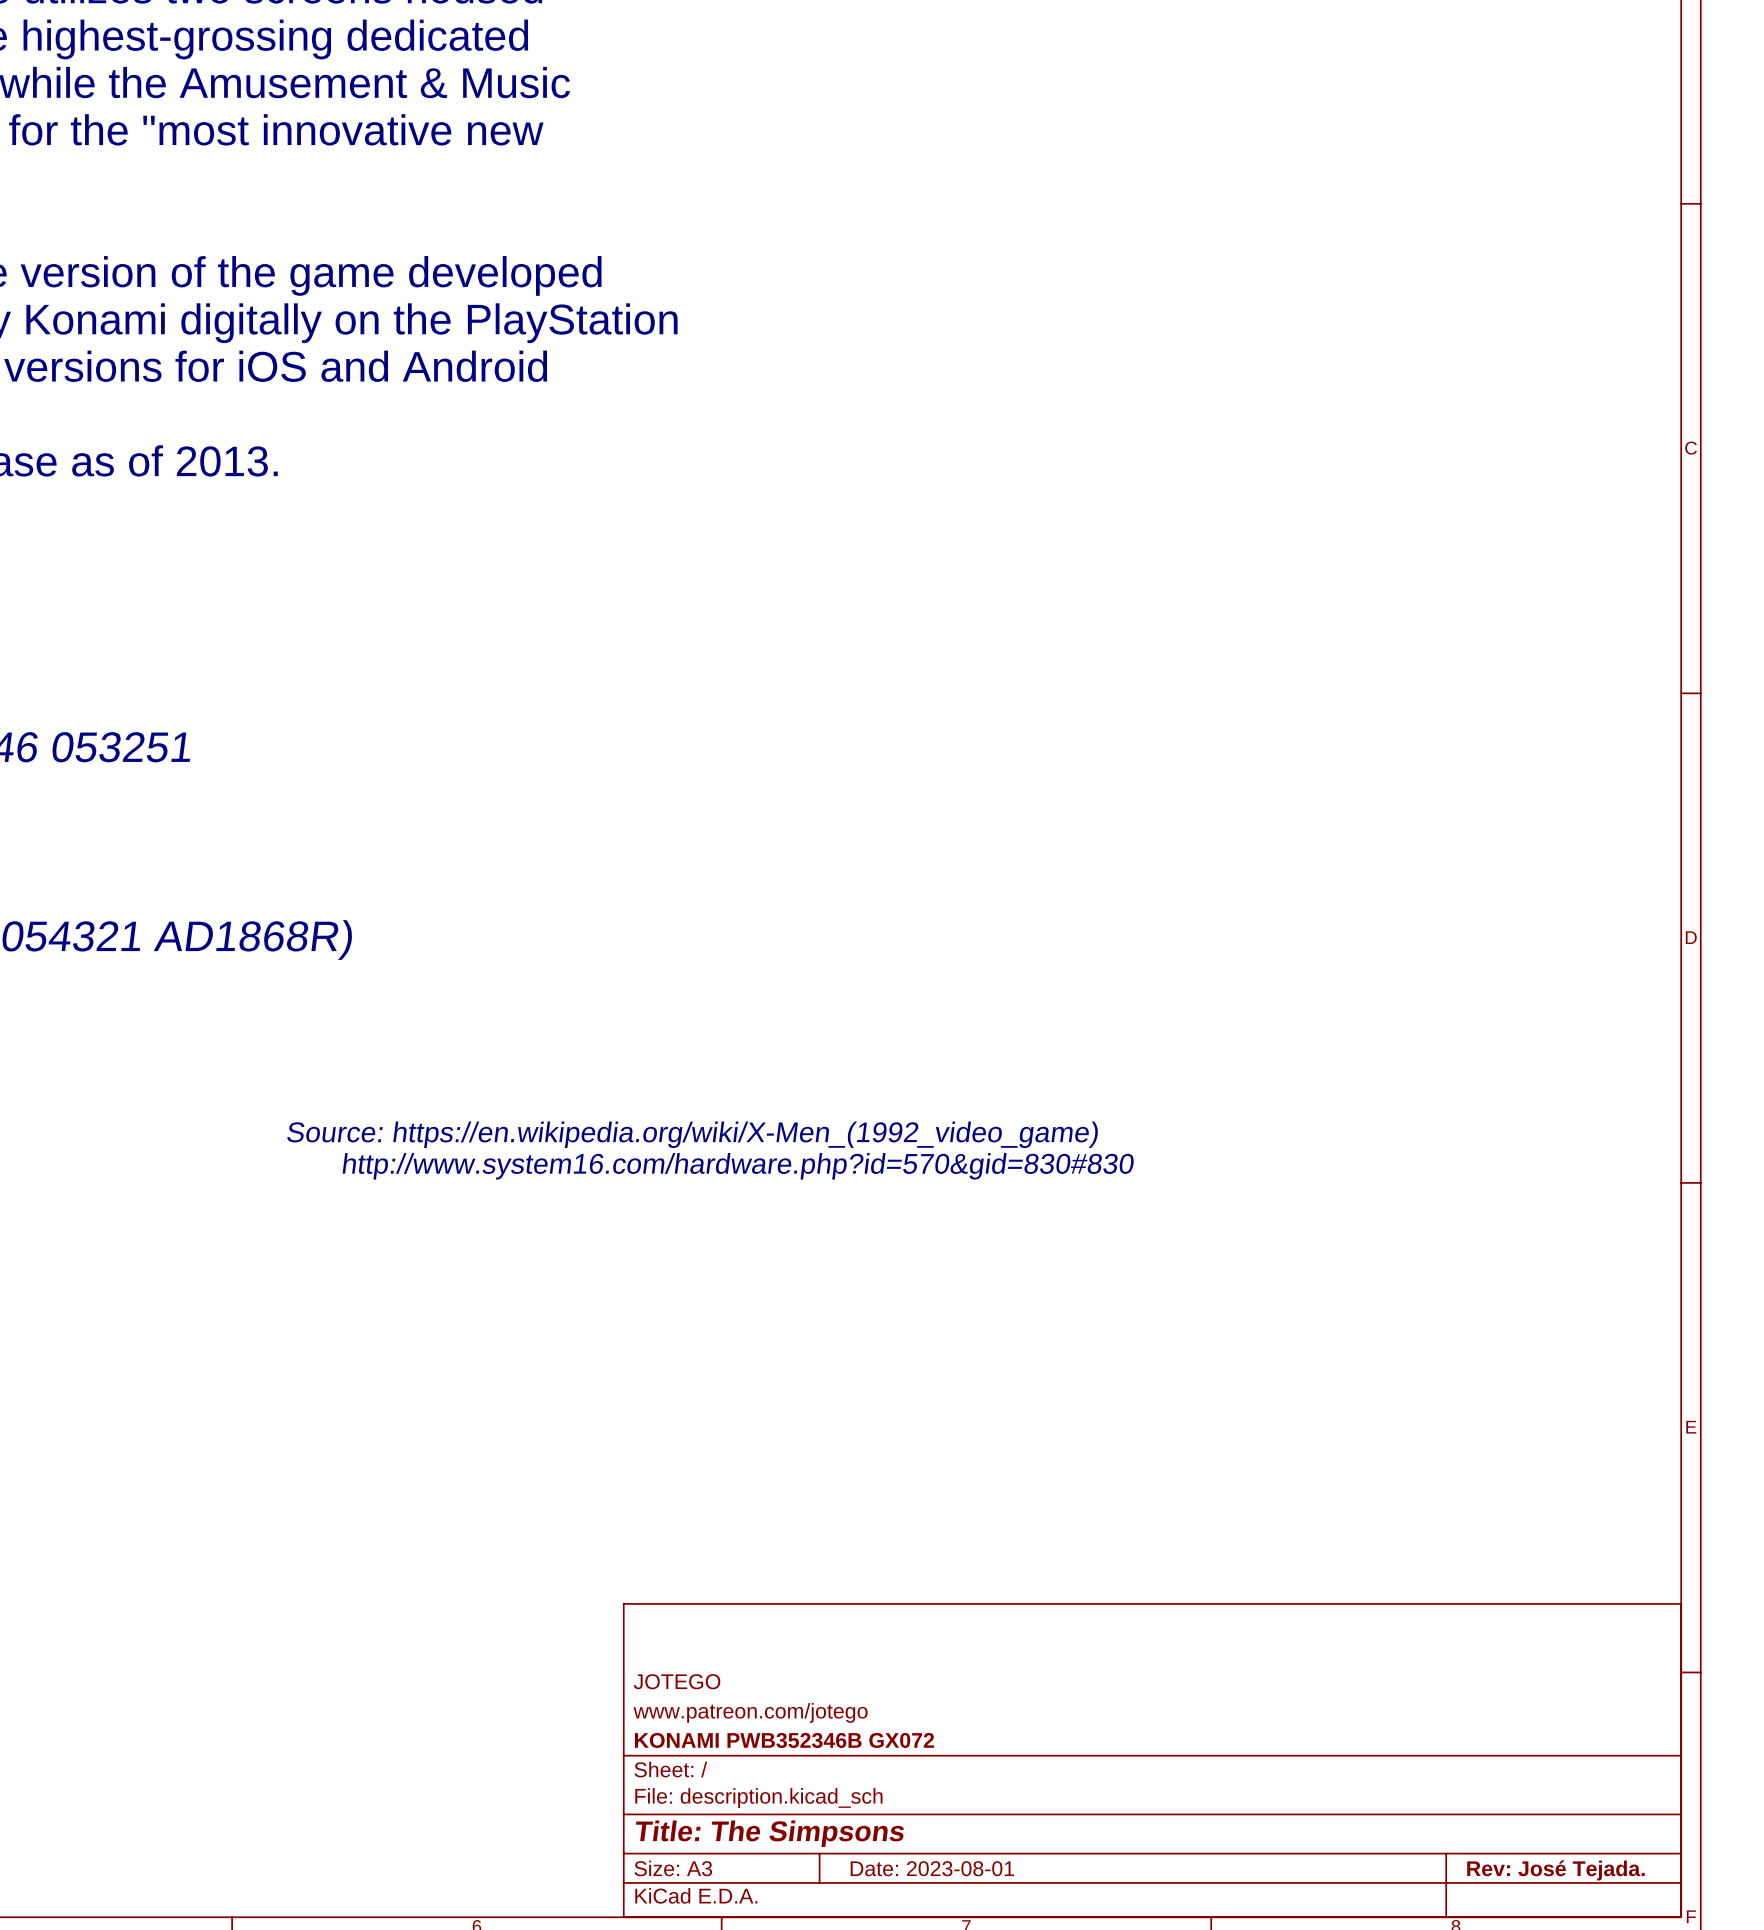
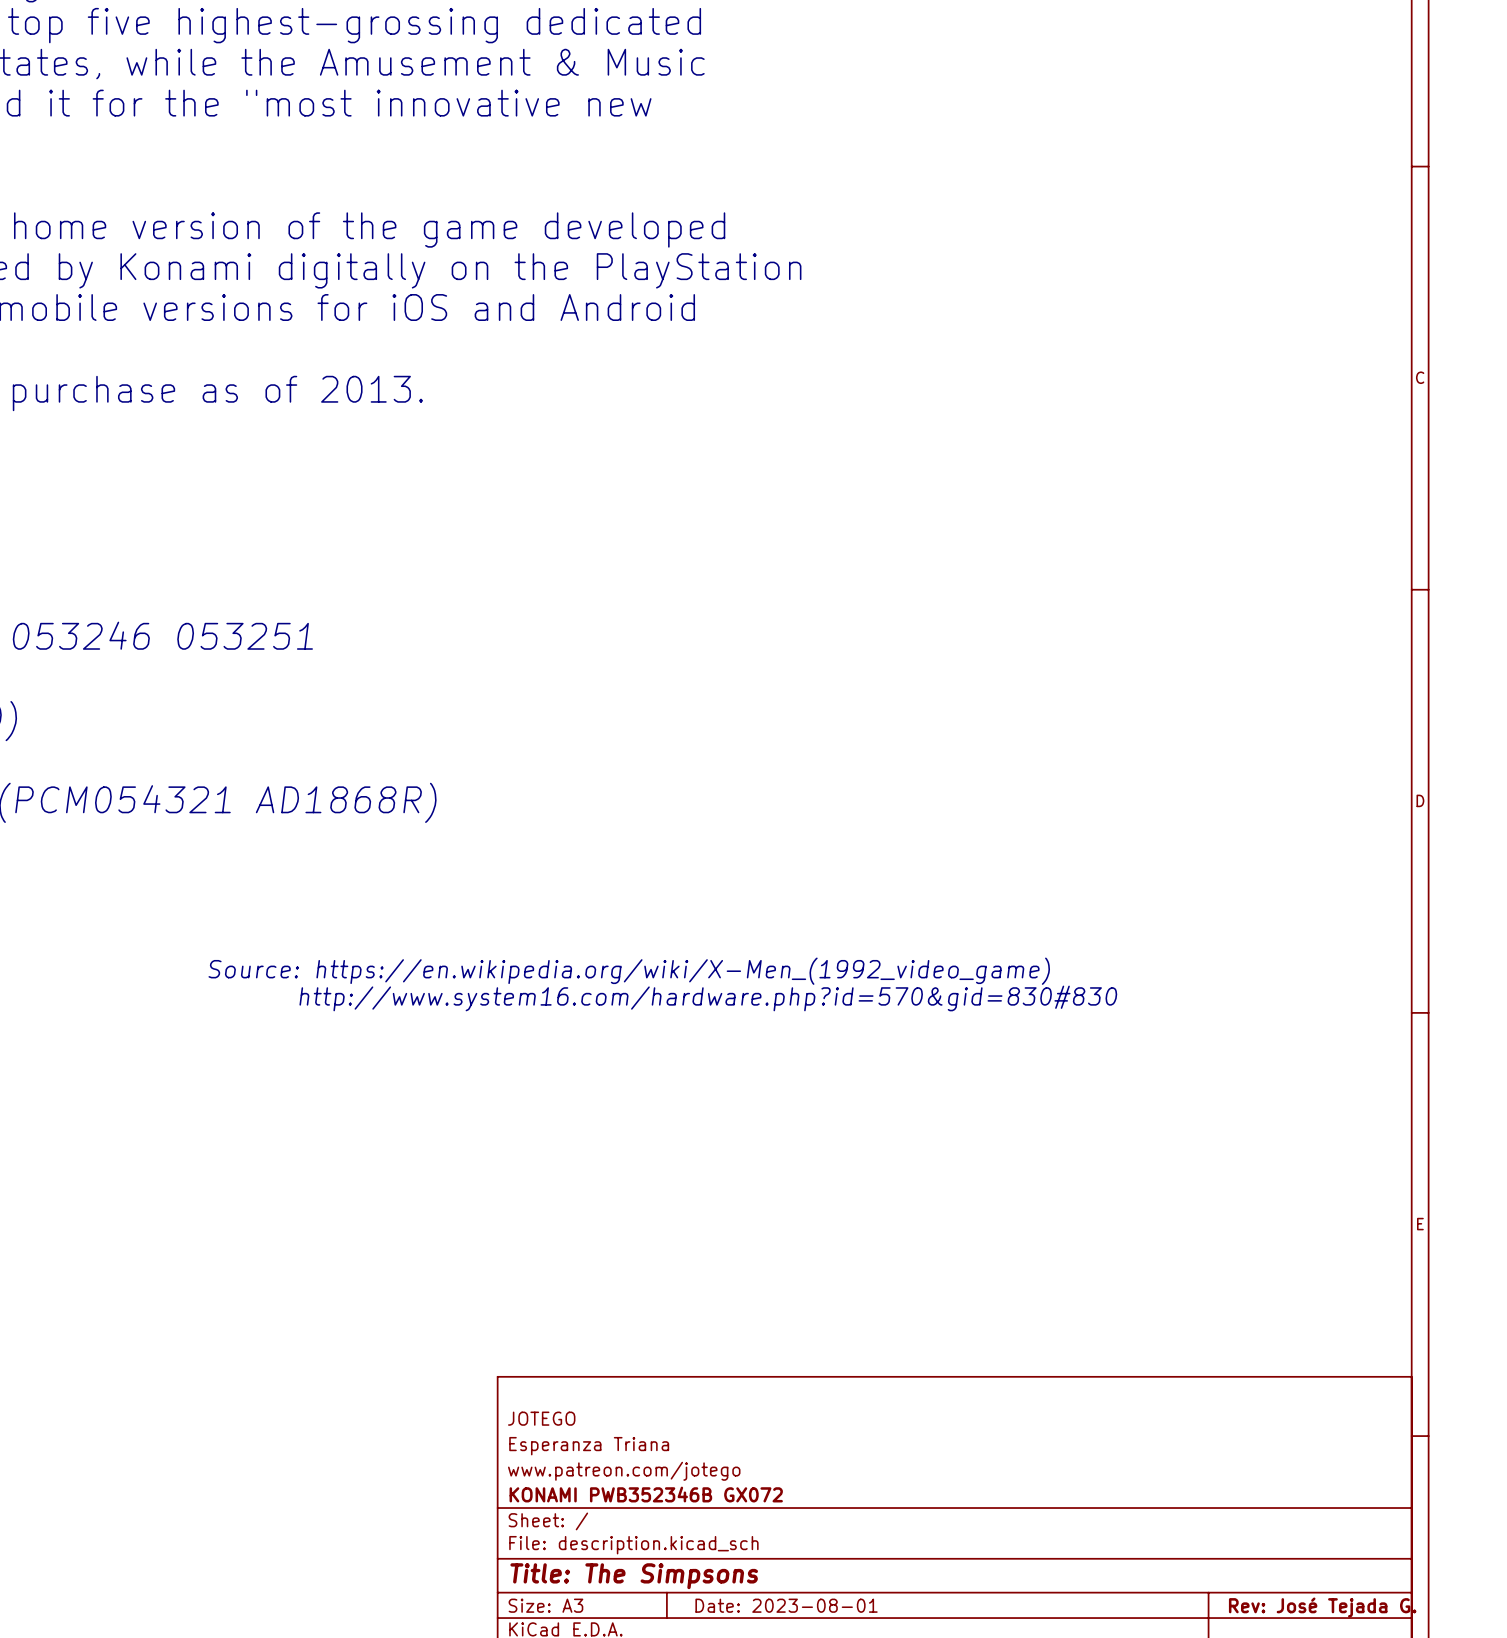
title block: none -> JOTEGO (541, 1418)
title block: JOTEGO (677, 1681) -> Esperanza Triana (589, 1446)
title block: Rev: José Tejada. (1555, 1870) -> Rev: José Tejada G. (1322, 1607)

